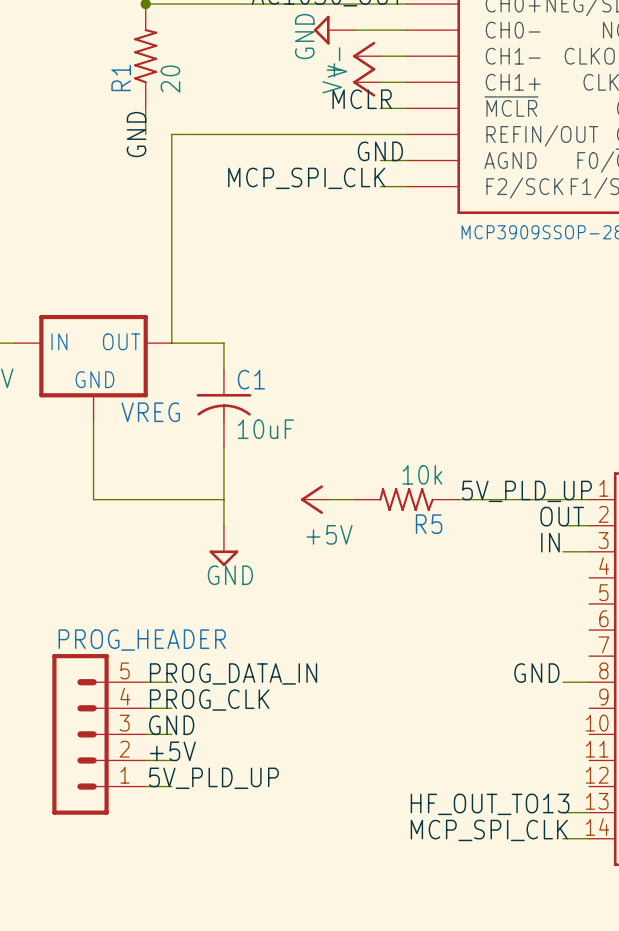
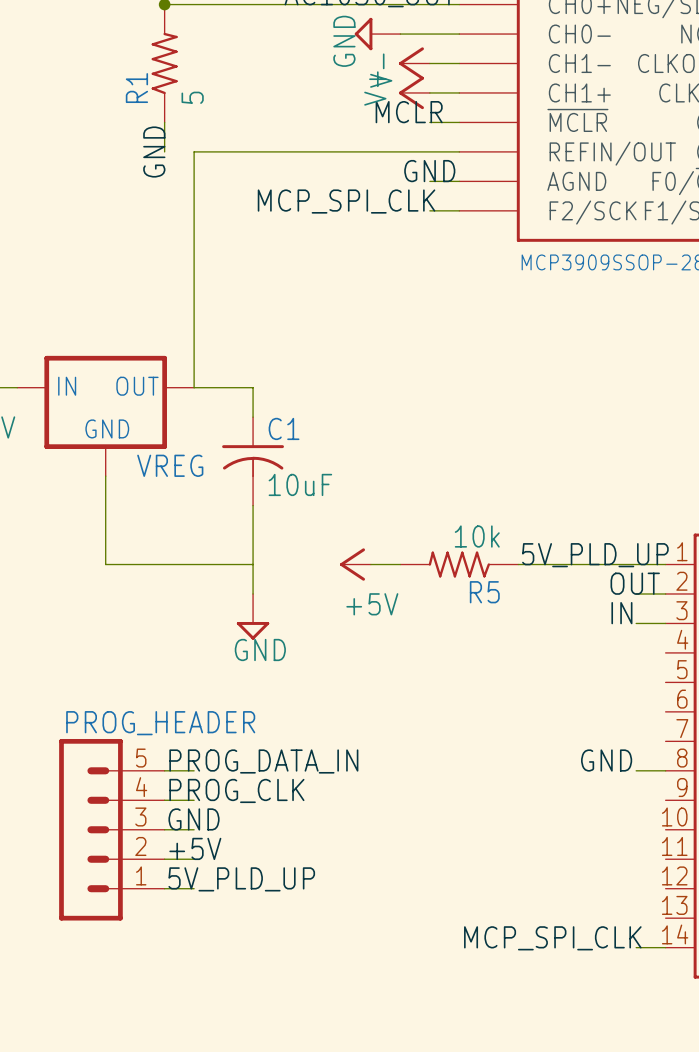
R1 value: 20 (170, 79) -> 5 (192, 97)
label: HF_OUT_TO13 (490, 804) -> none
wire: (563, 812) (589, 812) -> none

